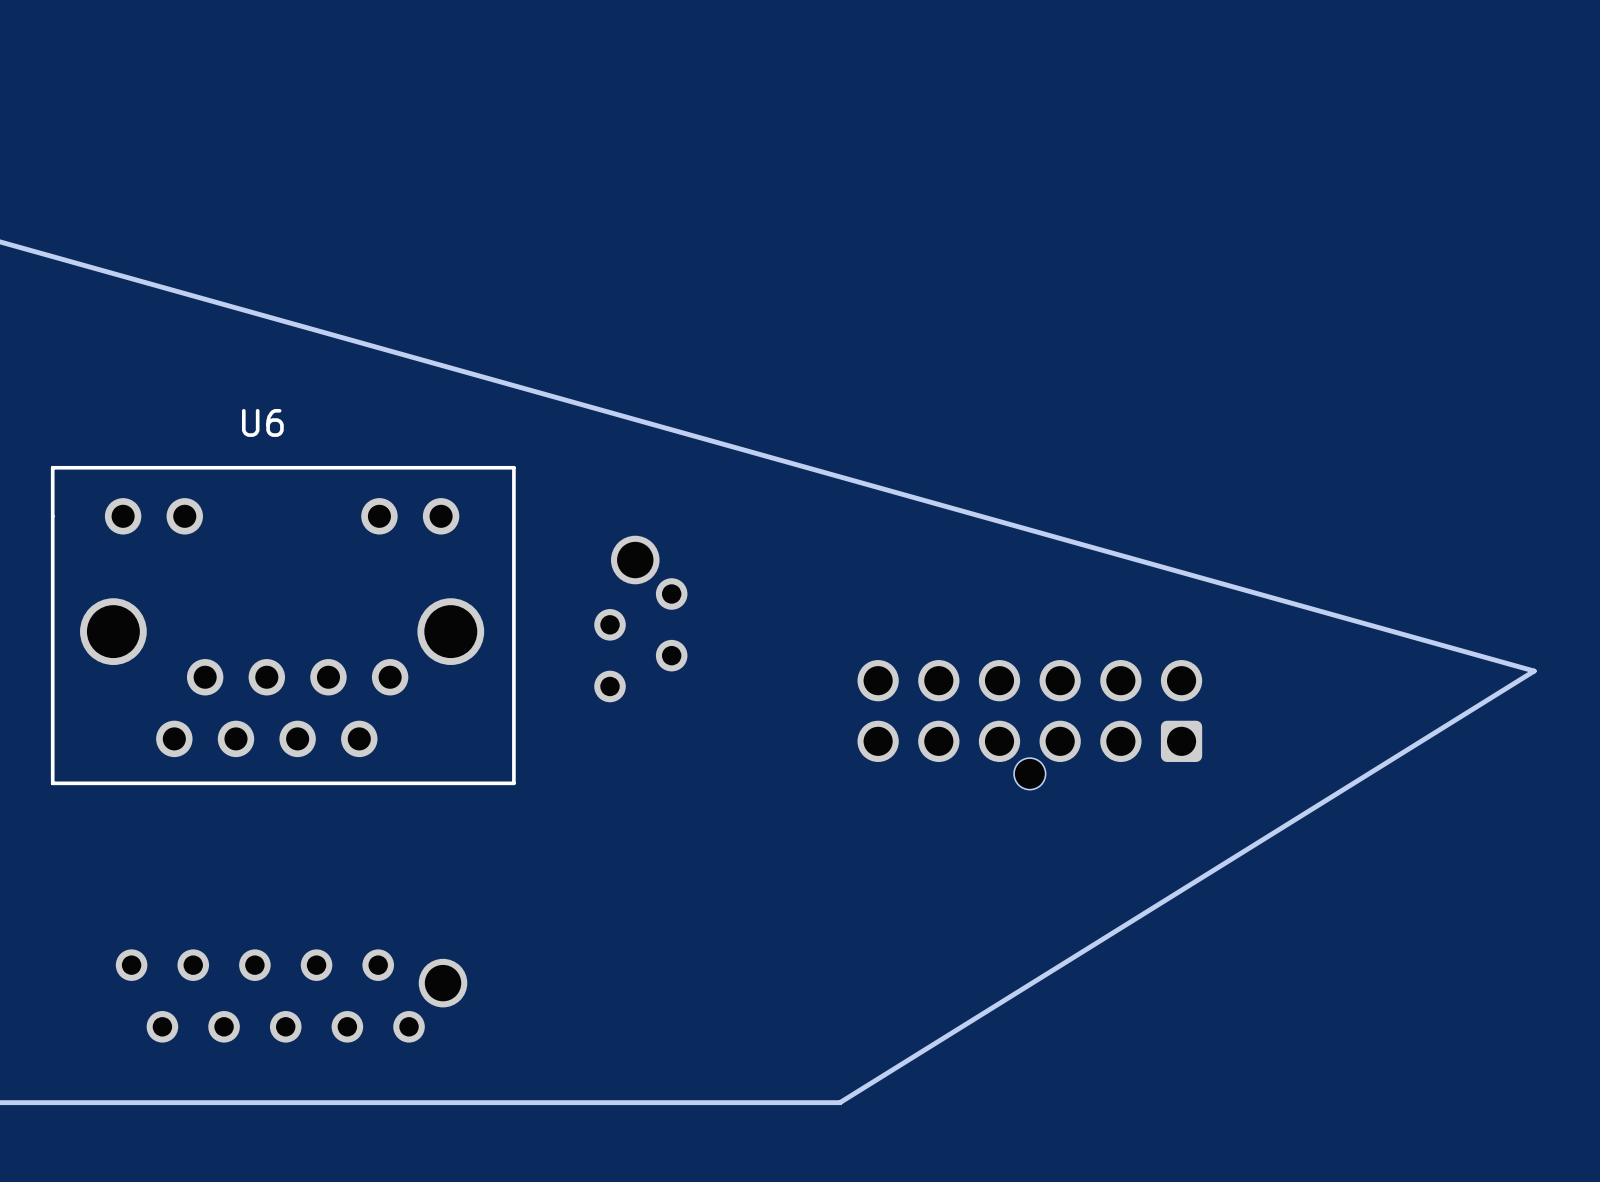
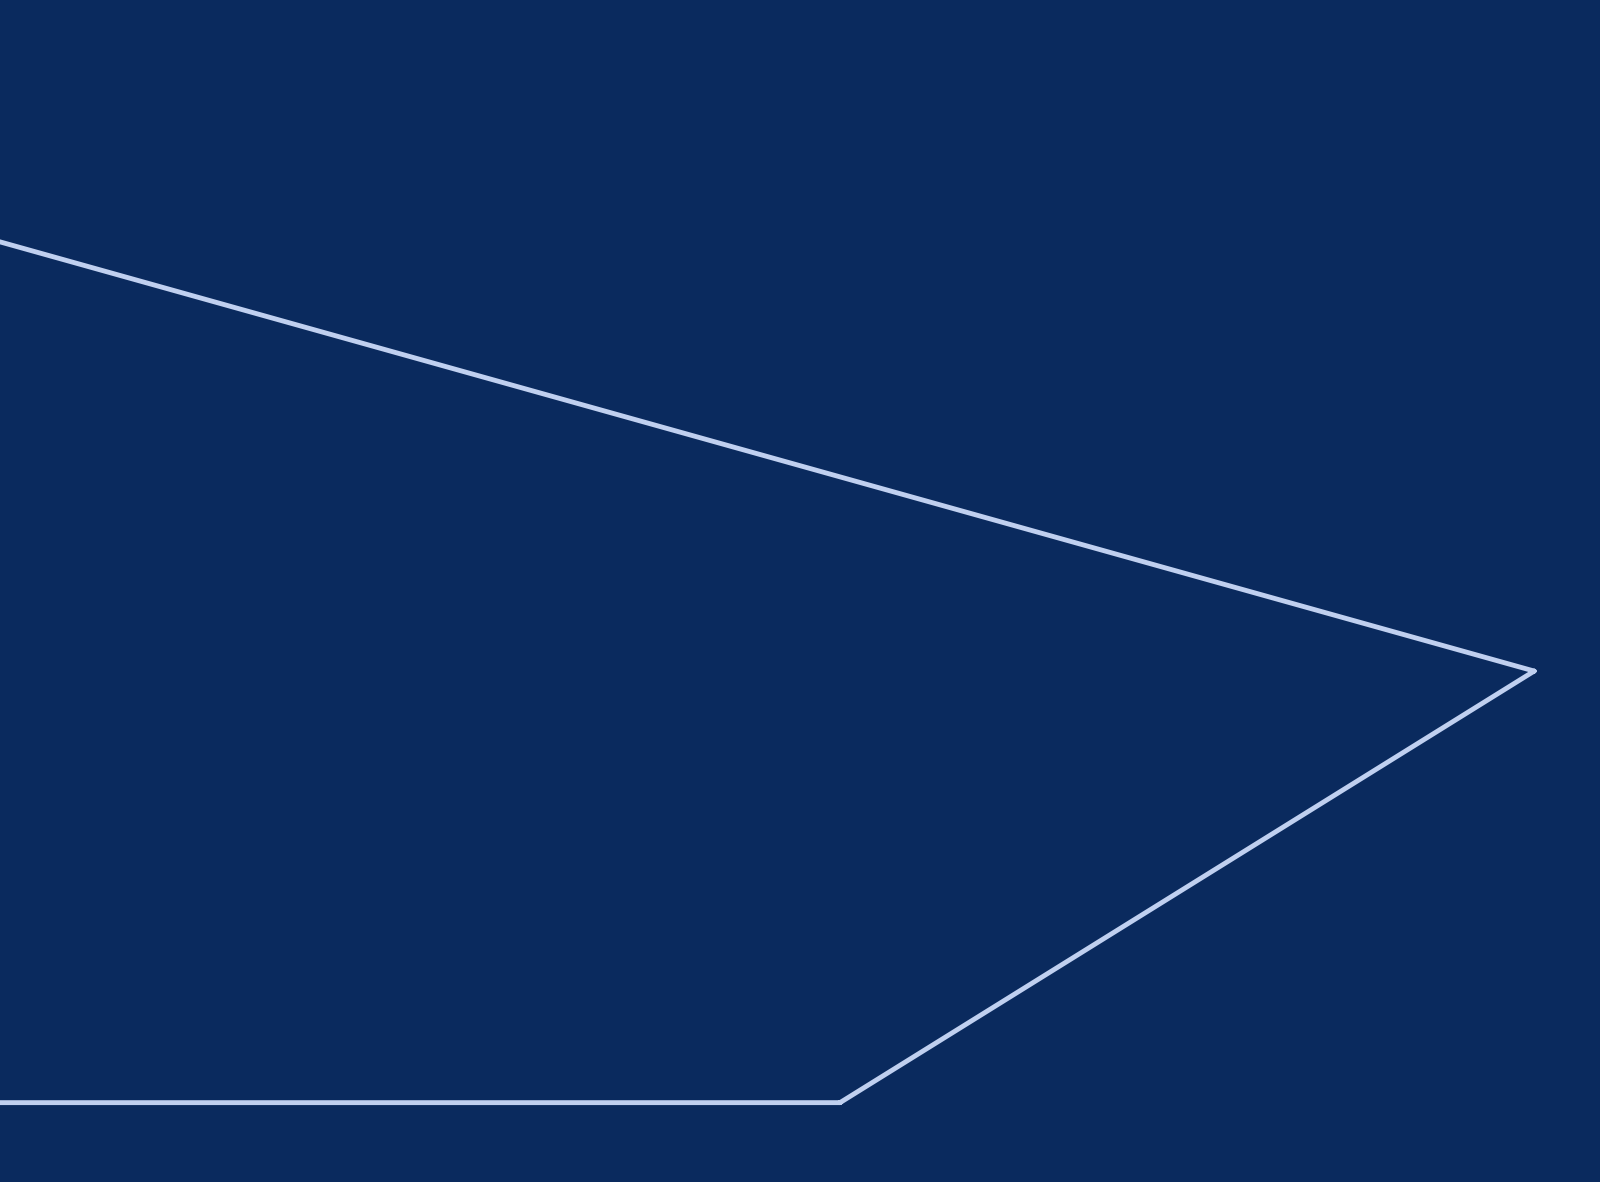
part: (640, 619) -> none
U6: (283, 625) -> none
part: (1029, 724) -> none
part: (291, 995) -> none

